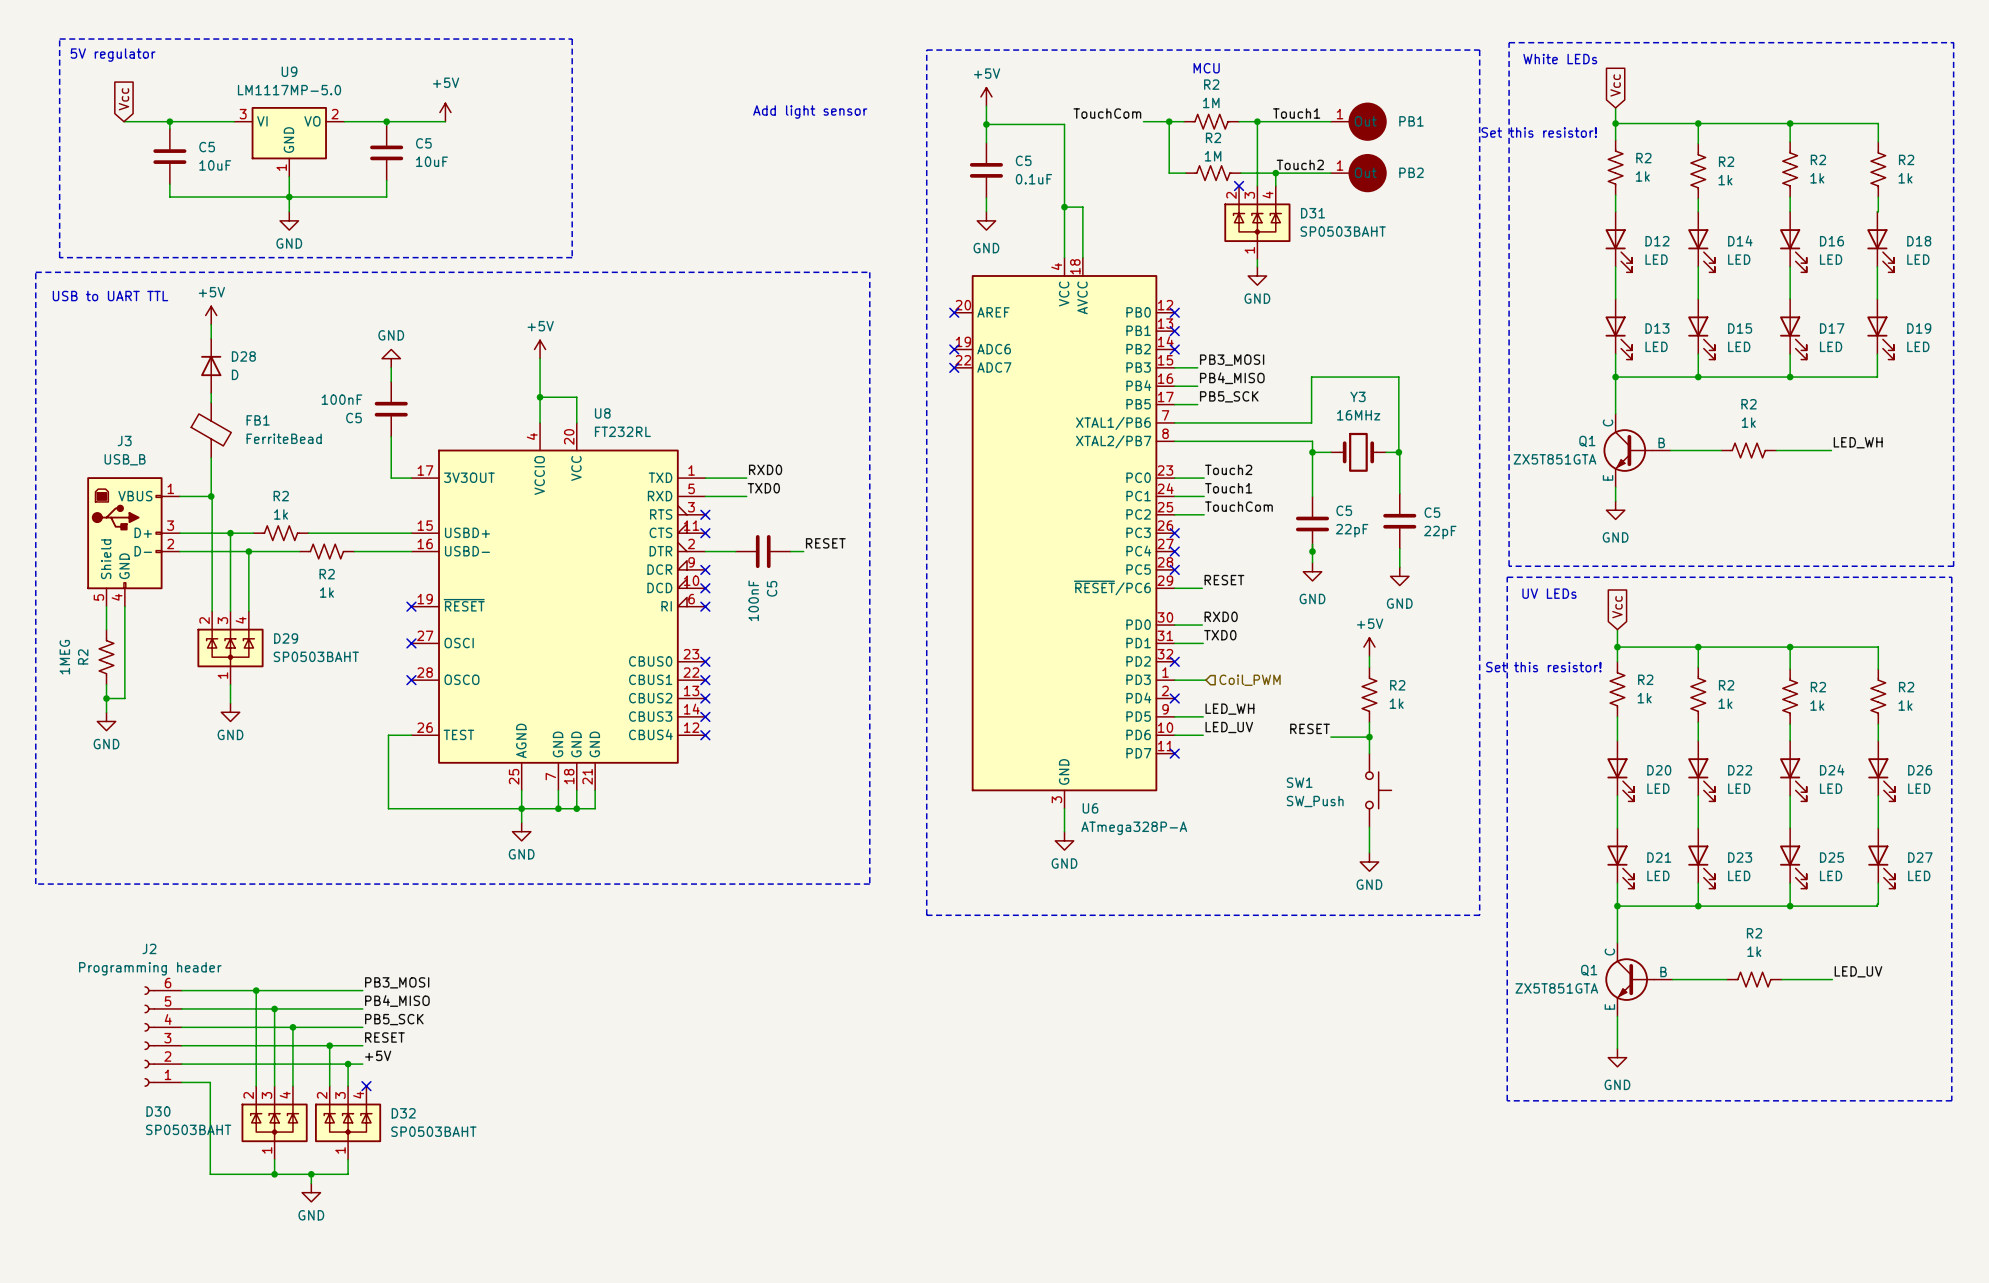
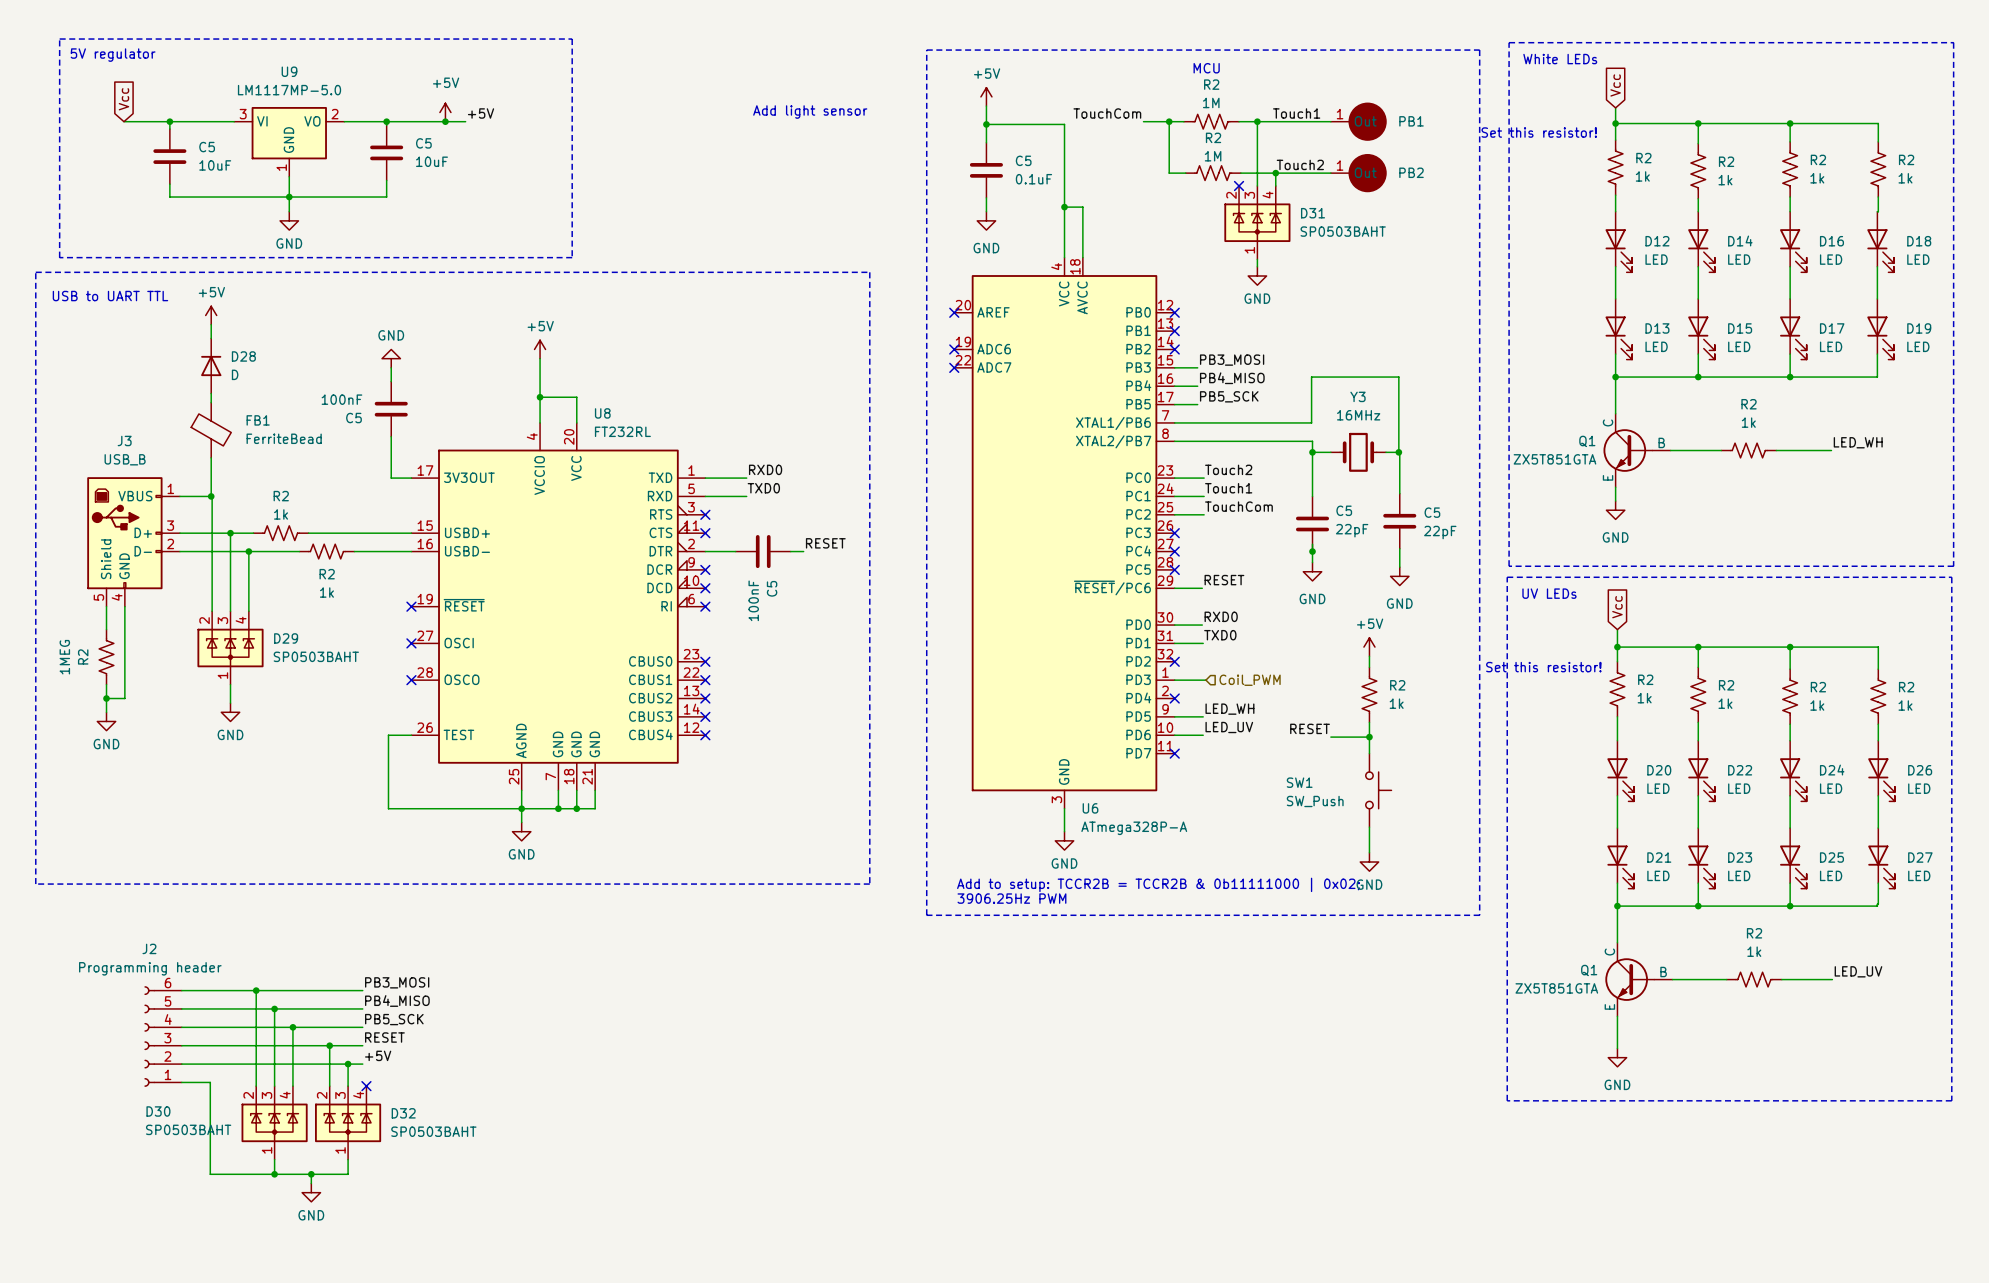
label: none -> +5V (481, 113)
wire: none -> (445, 121) (465, 121)
junction: none -> (445, 121)
text: none -> Add to setup: TCCR2B = TCCR2B & 0b11111000 | 0x02; (1158, 884)
text: none -> 3906.25Hz PWM (1011, 898)

